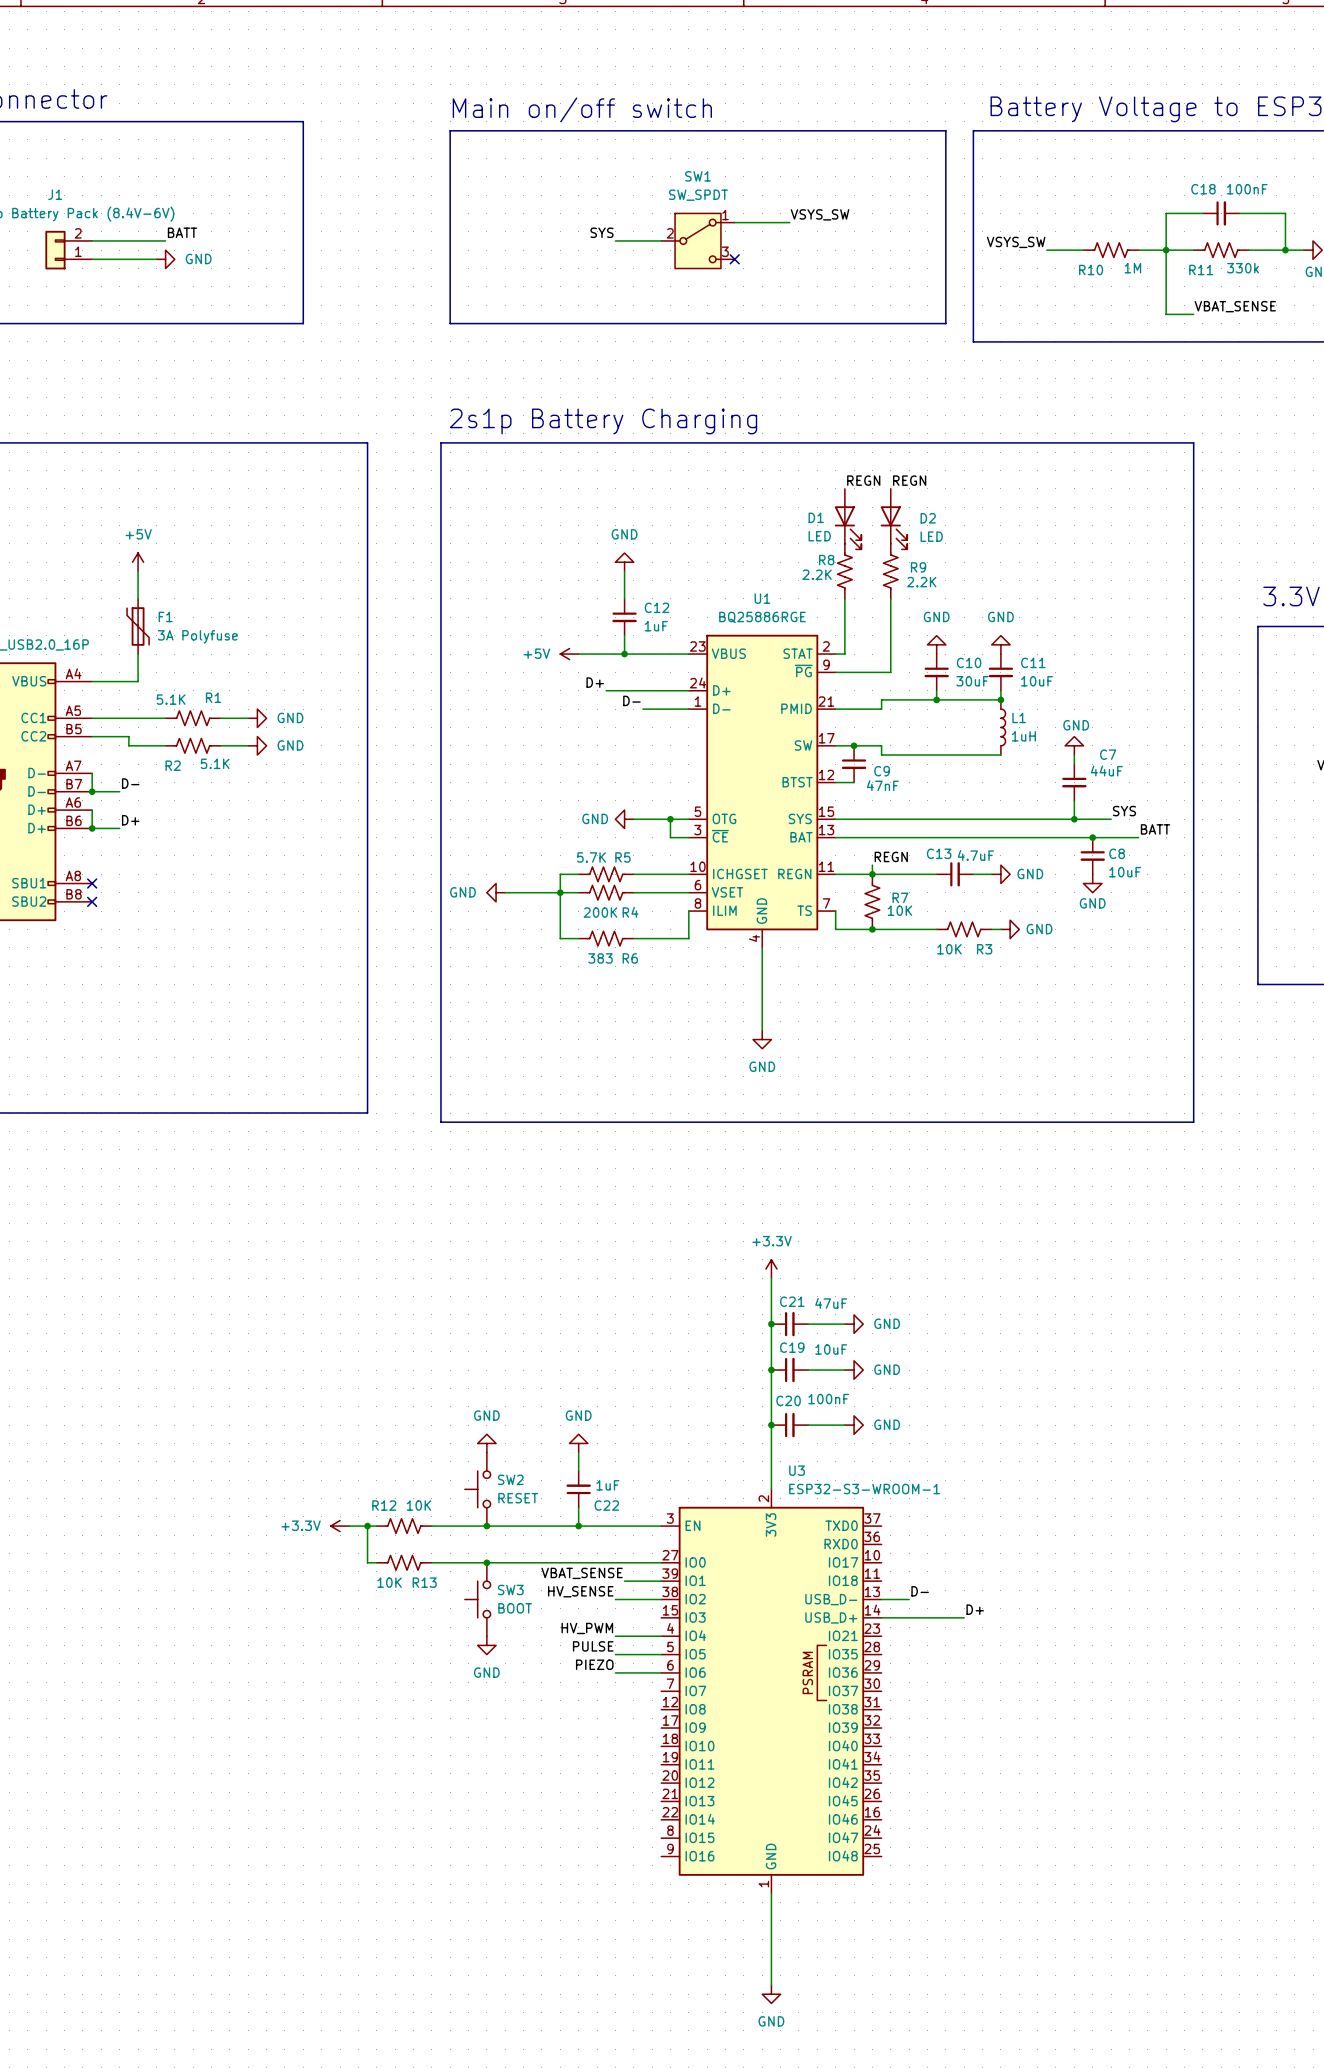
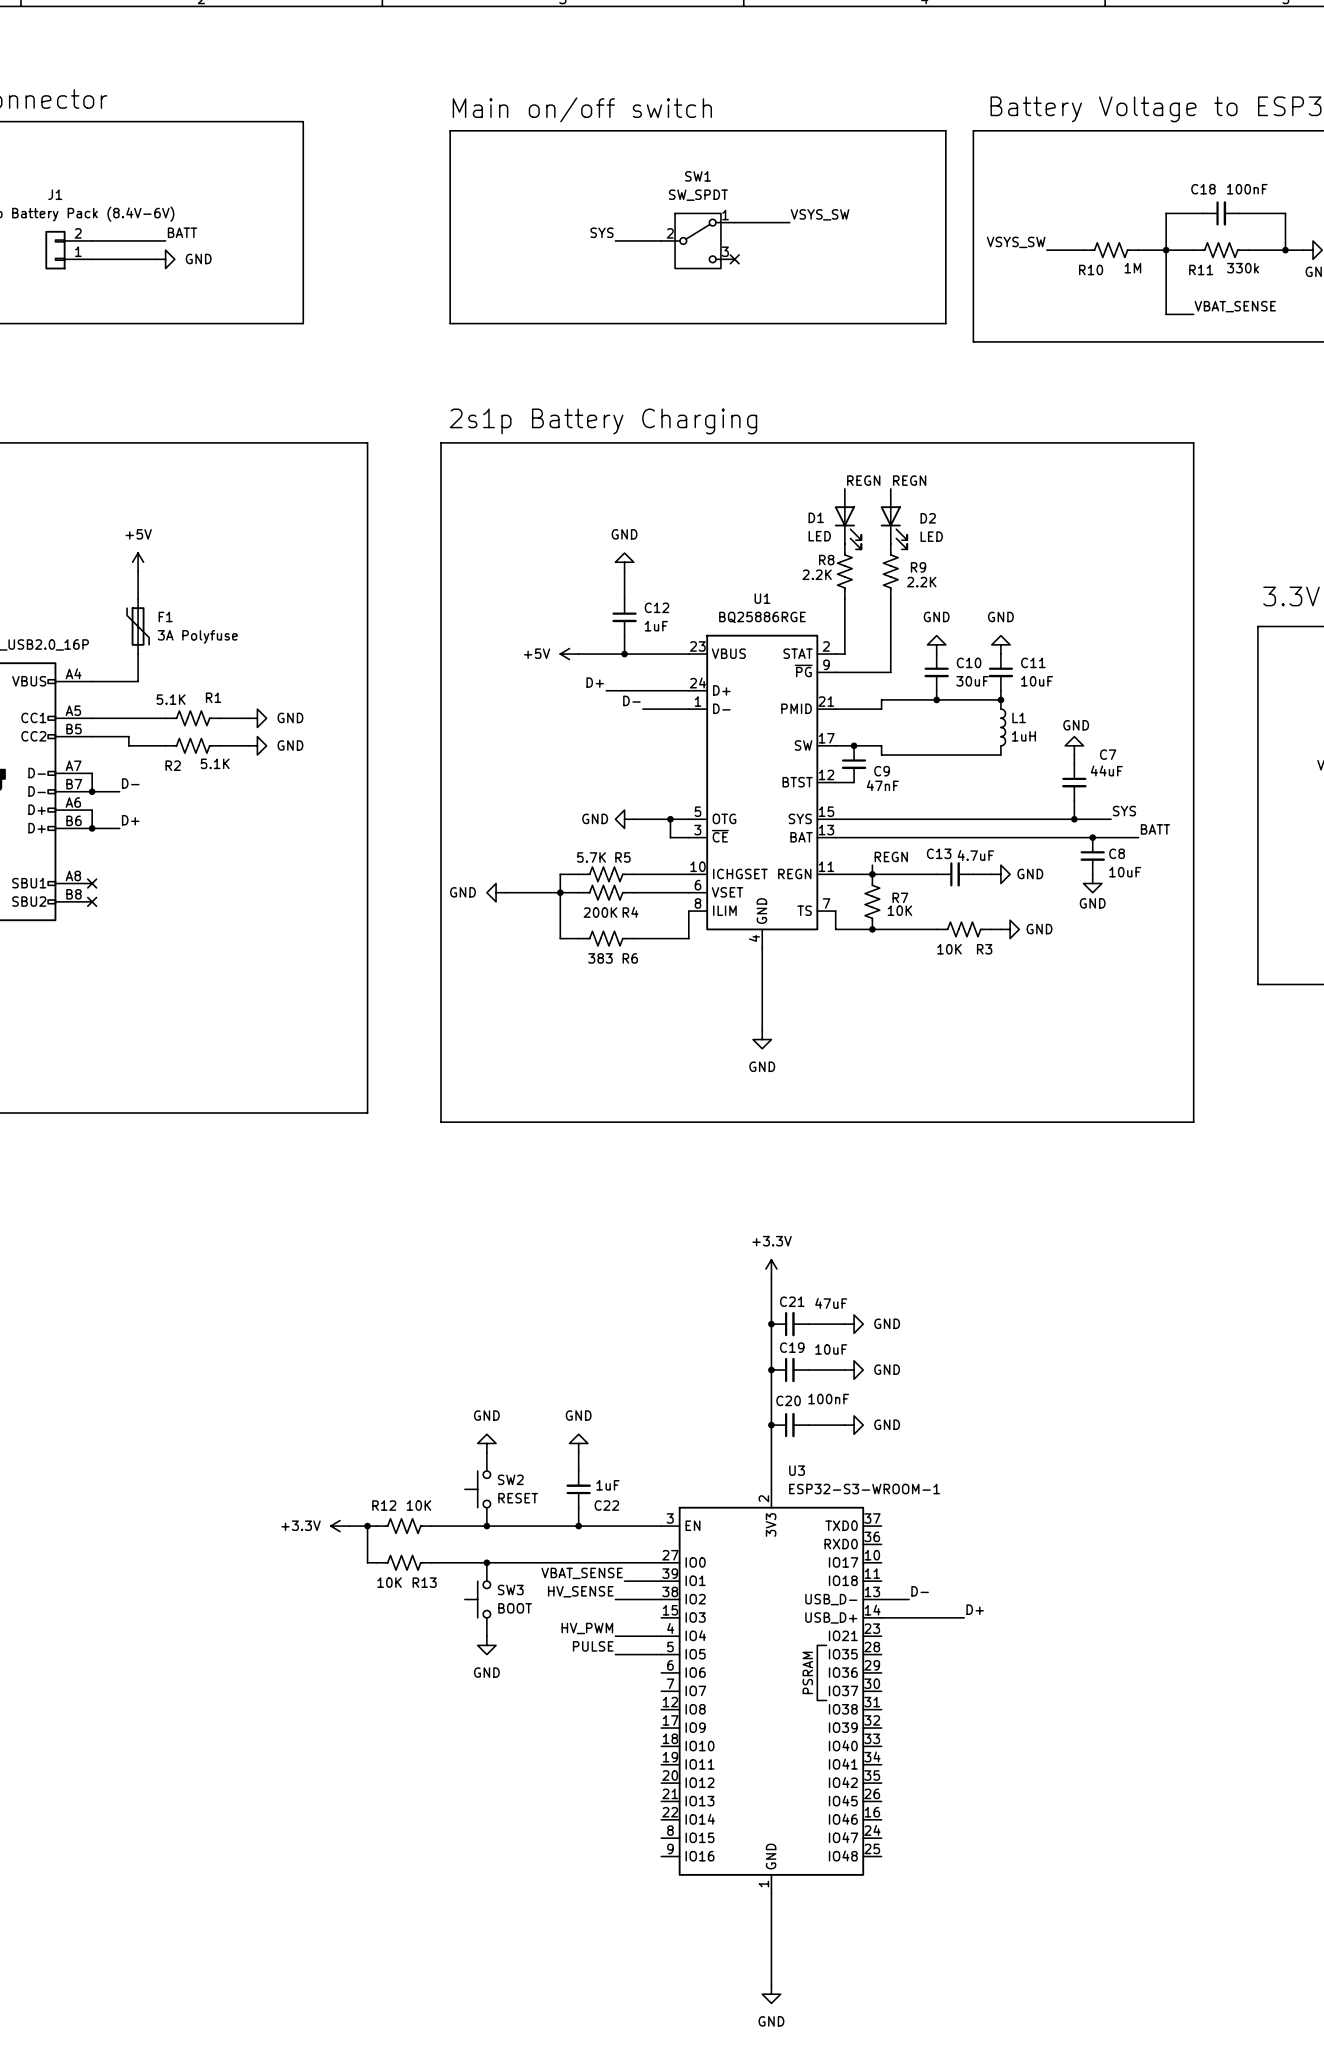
label: PIEZO (594, 1664) -> none
wire: (615, 1672) (661, 1672) -> none

